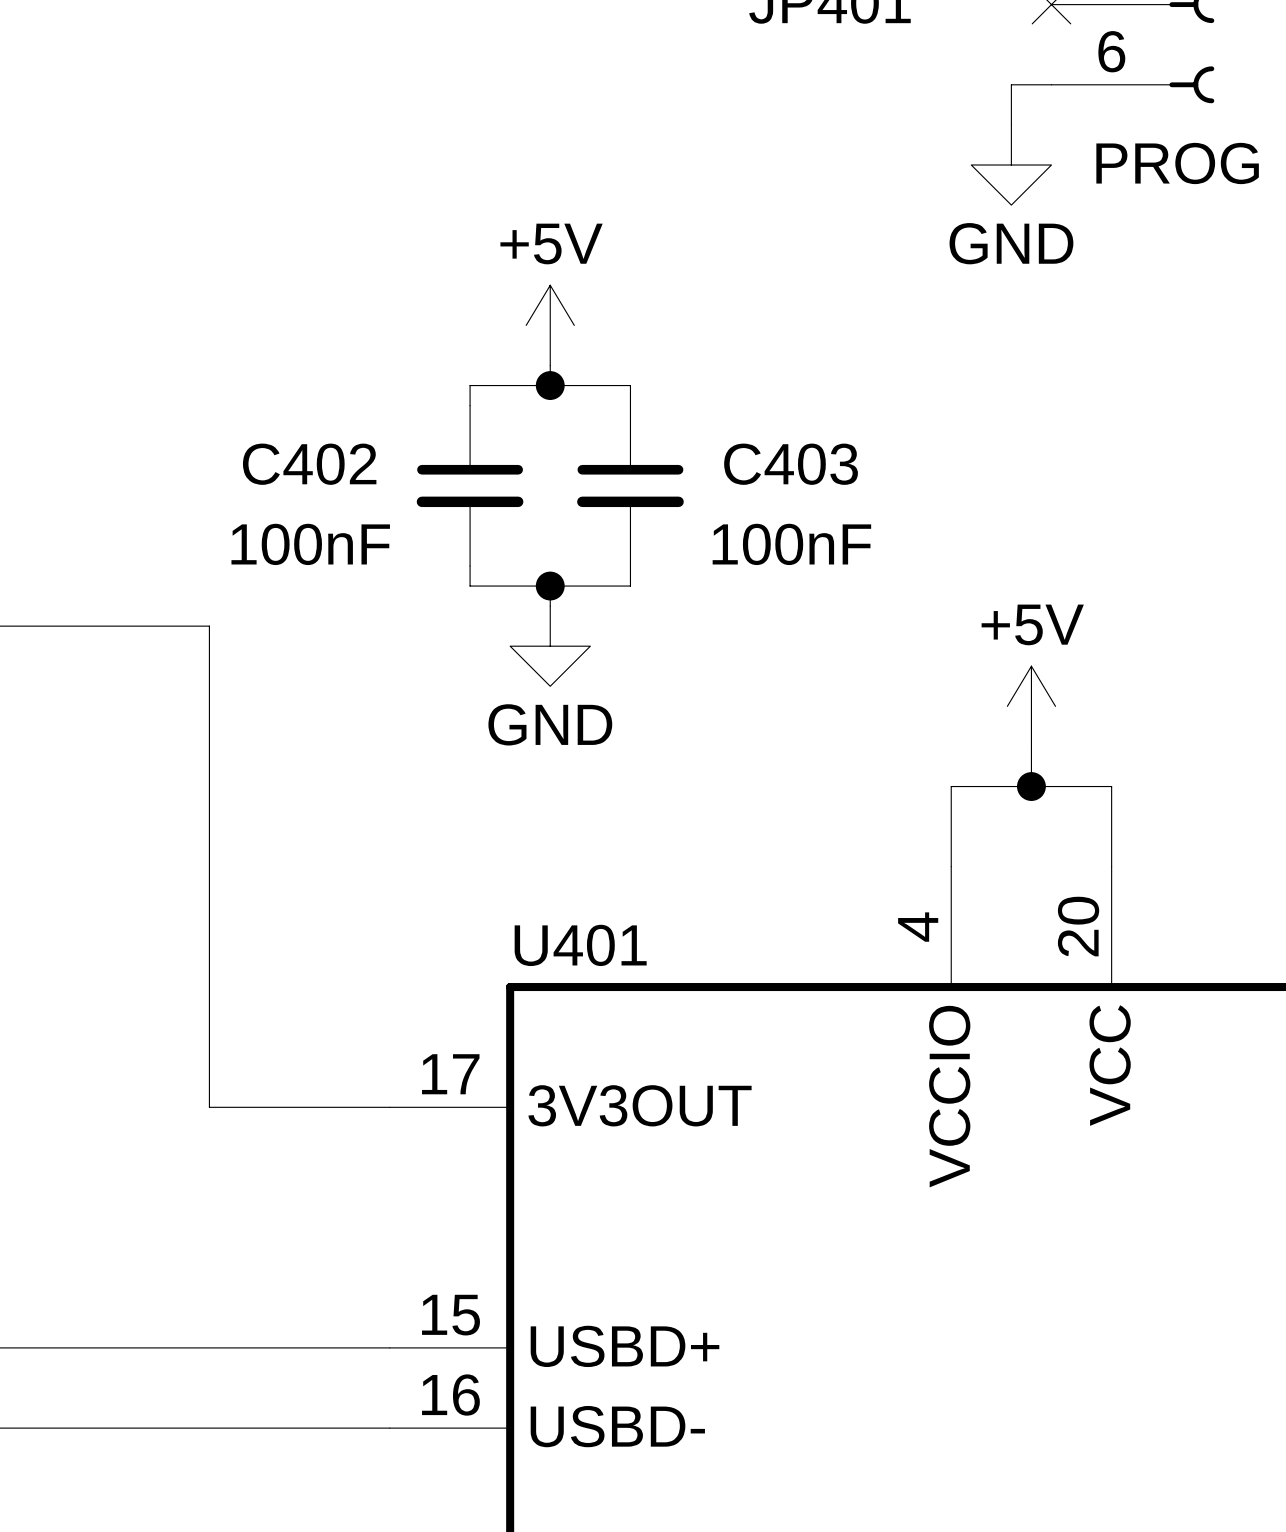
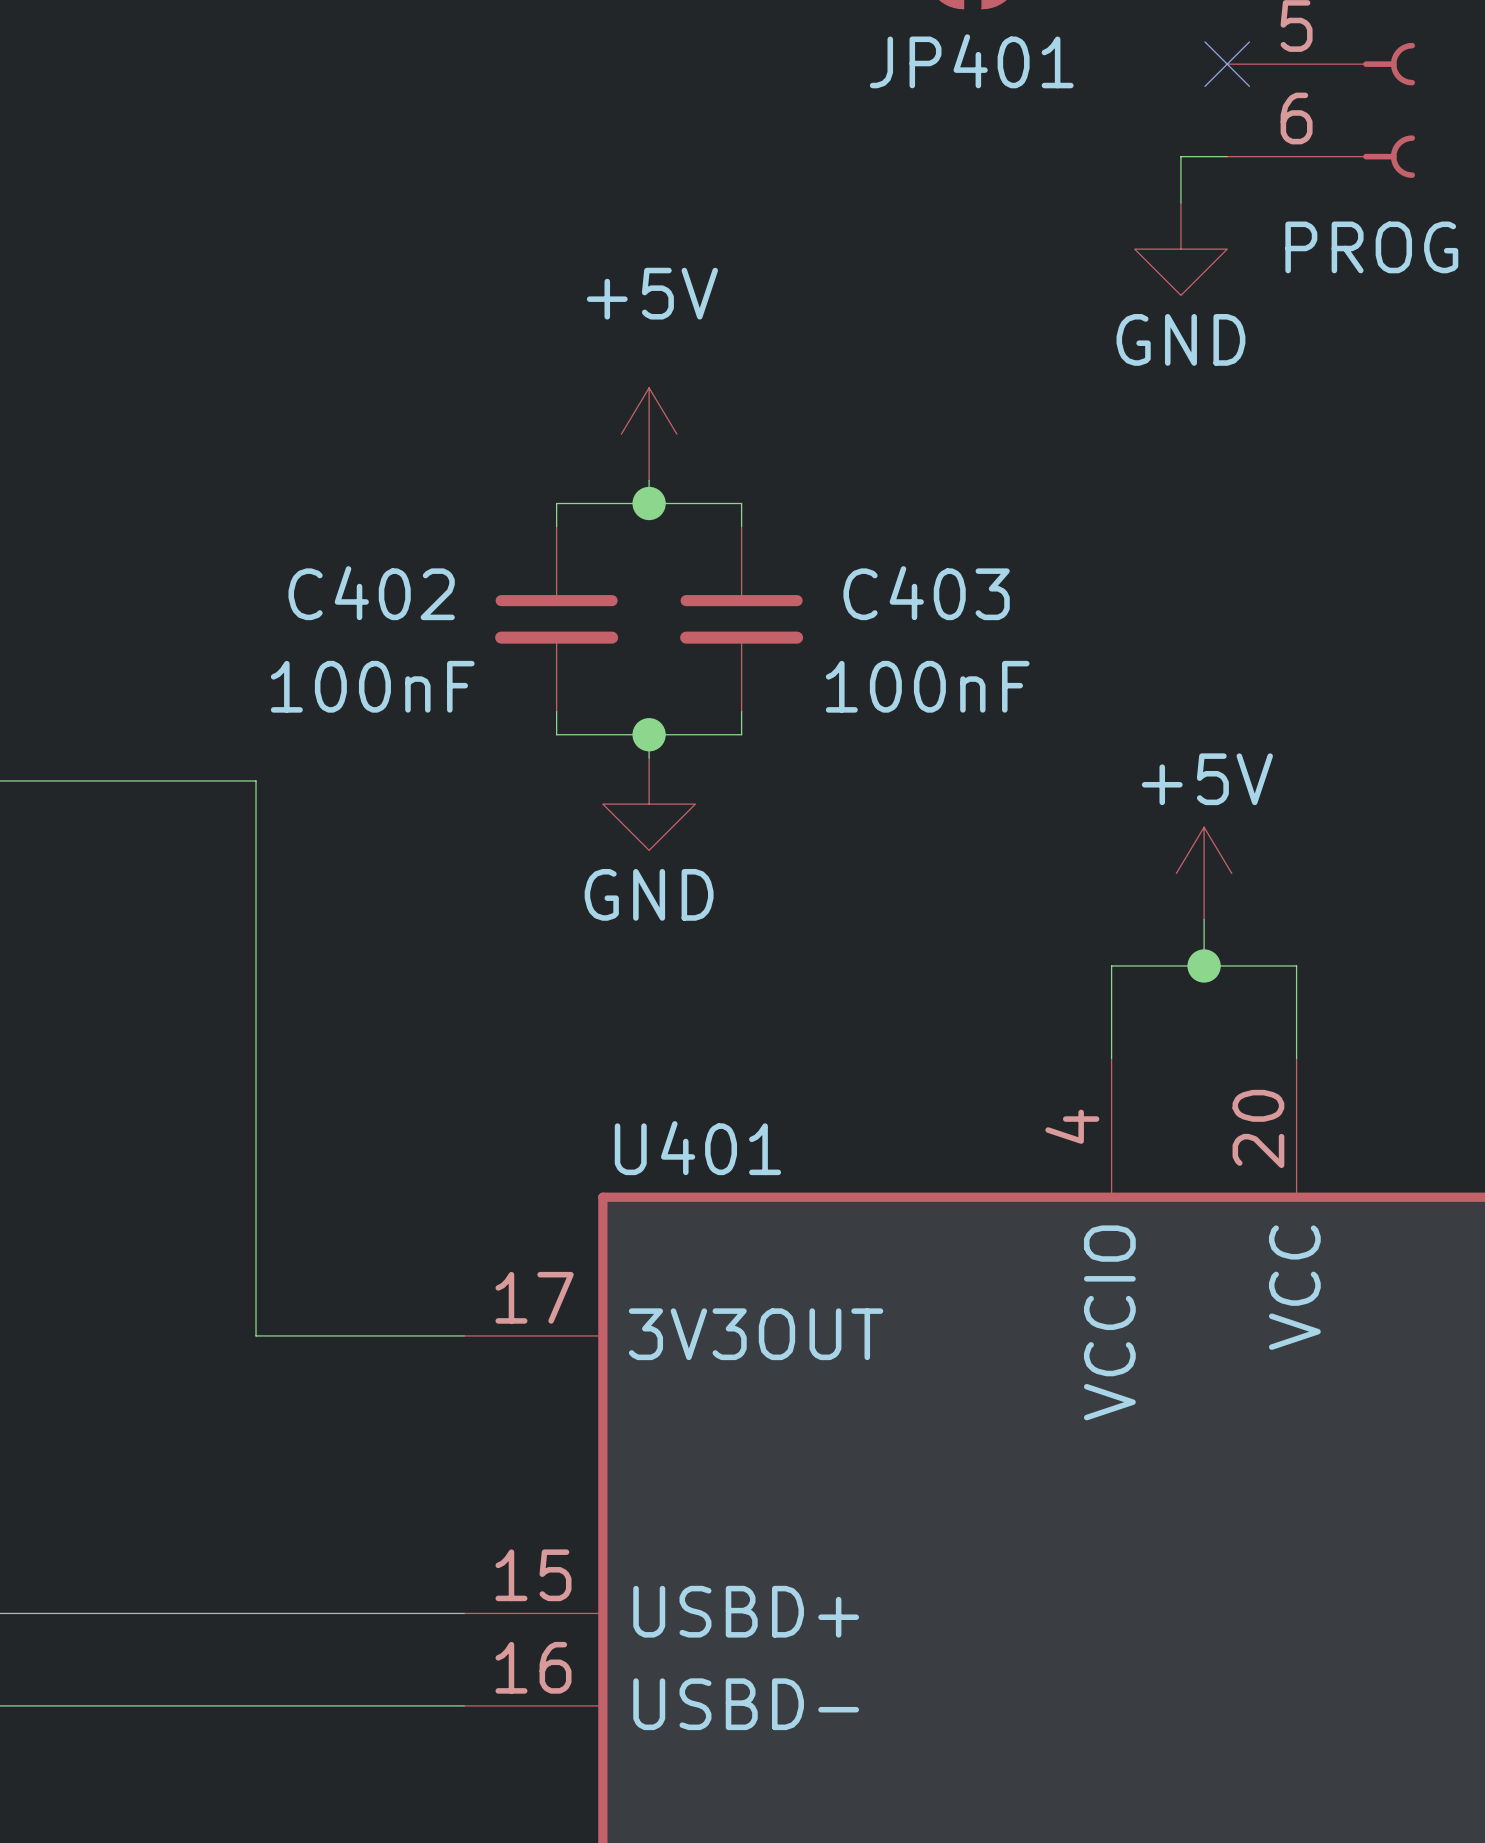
power symbol text position: +5V (551, 243) -> +5V (652, 293)

